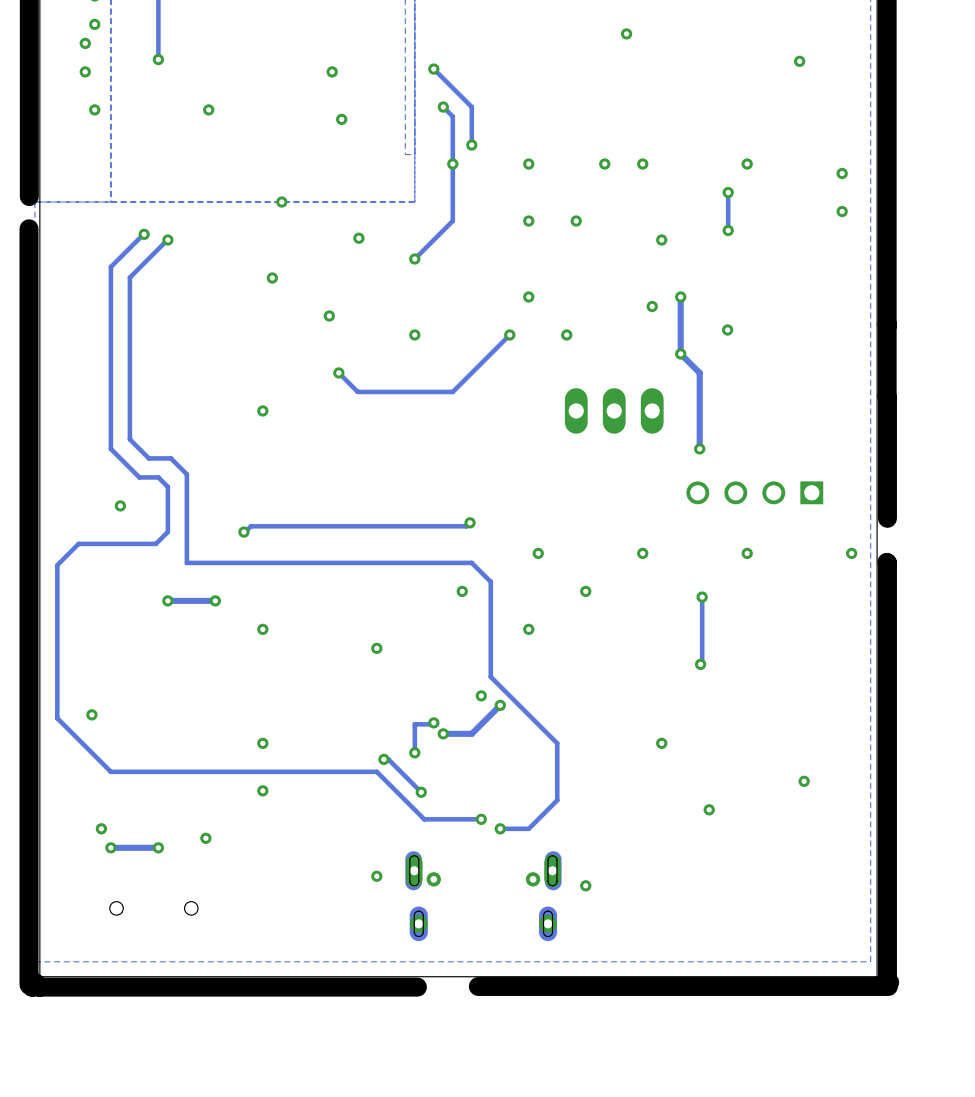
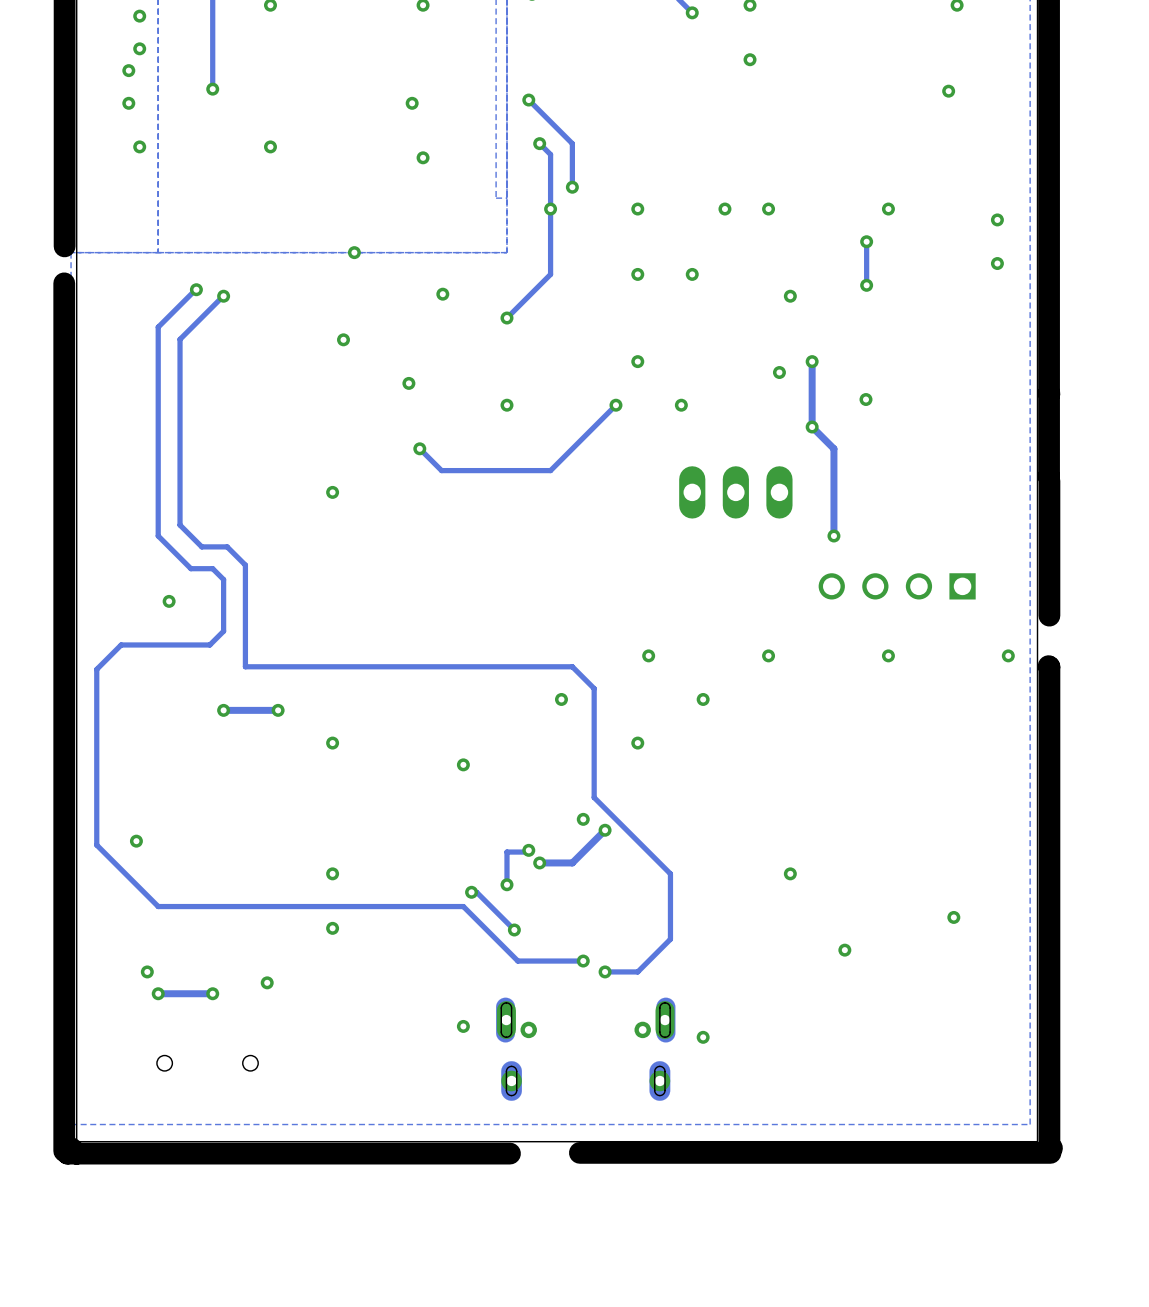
track: (470, 522) (466, 526) (250, 526) (243, 532) -> none
via: (470, 522) -> none
via: (243, 532) -> none
track: (702, 597) (702, 663) (700, 664) -> none
via: (702, 597) -> none
via: (700, 664) -> none

